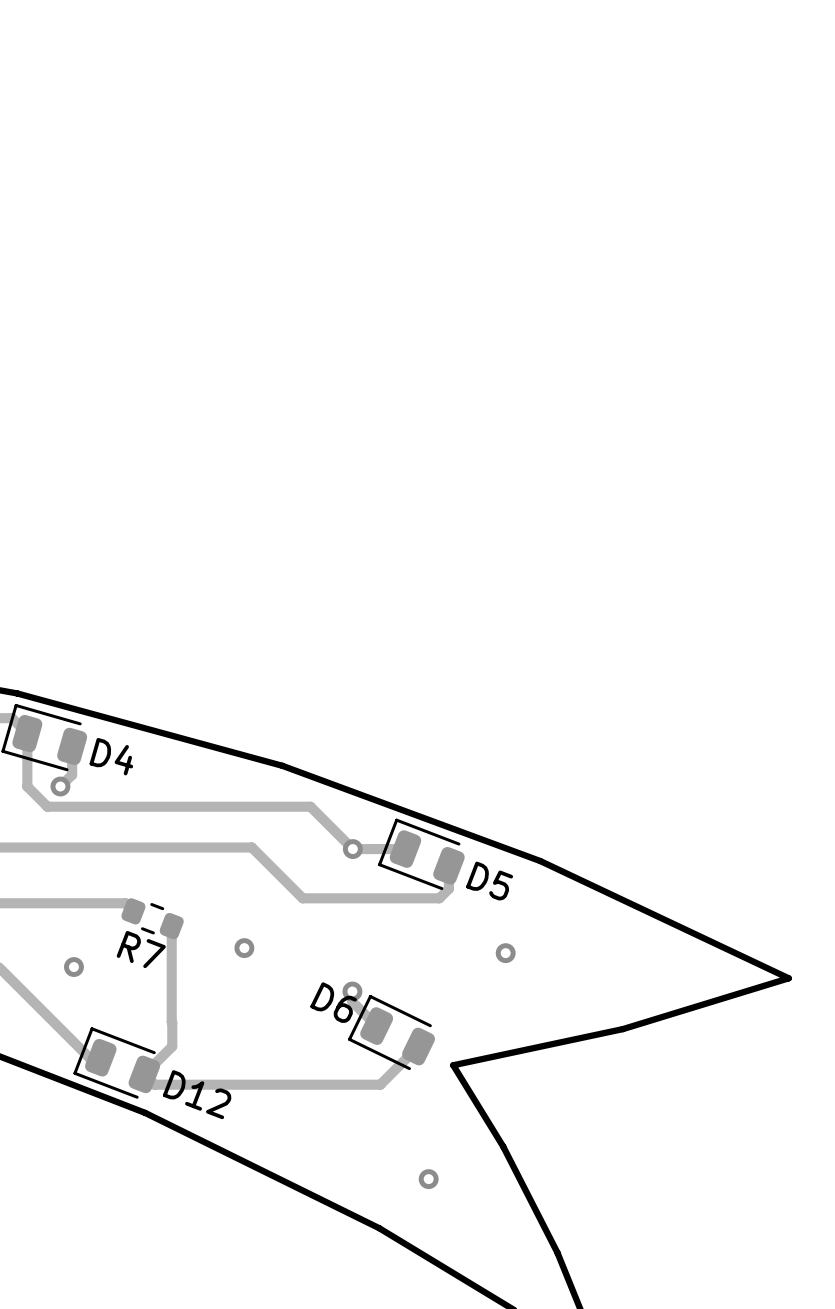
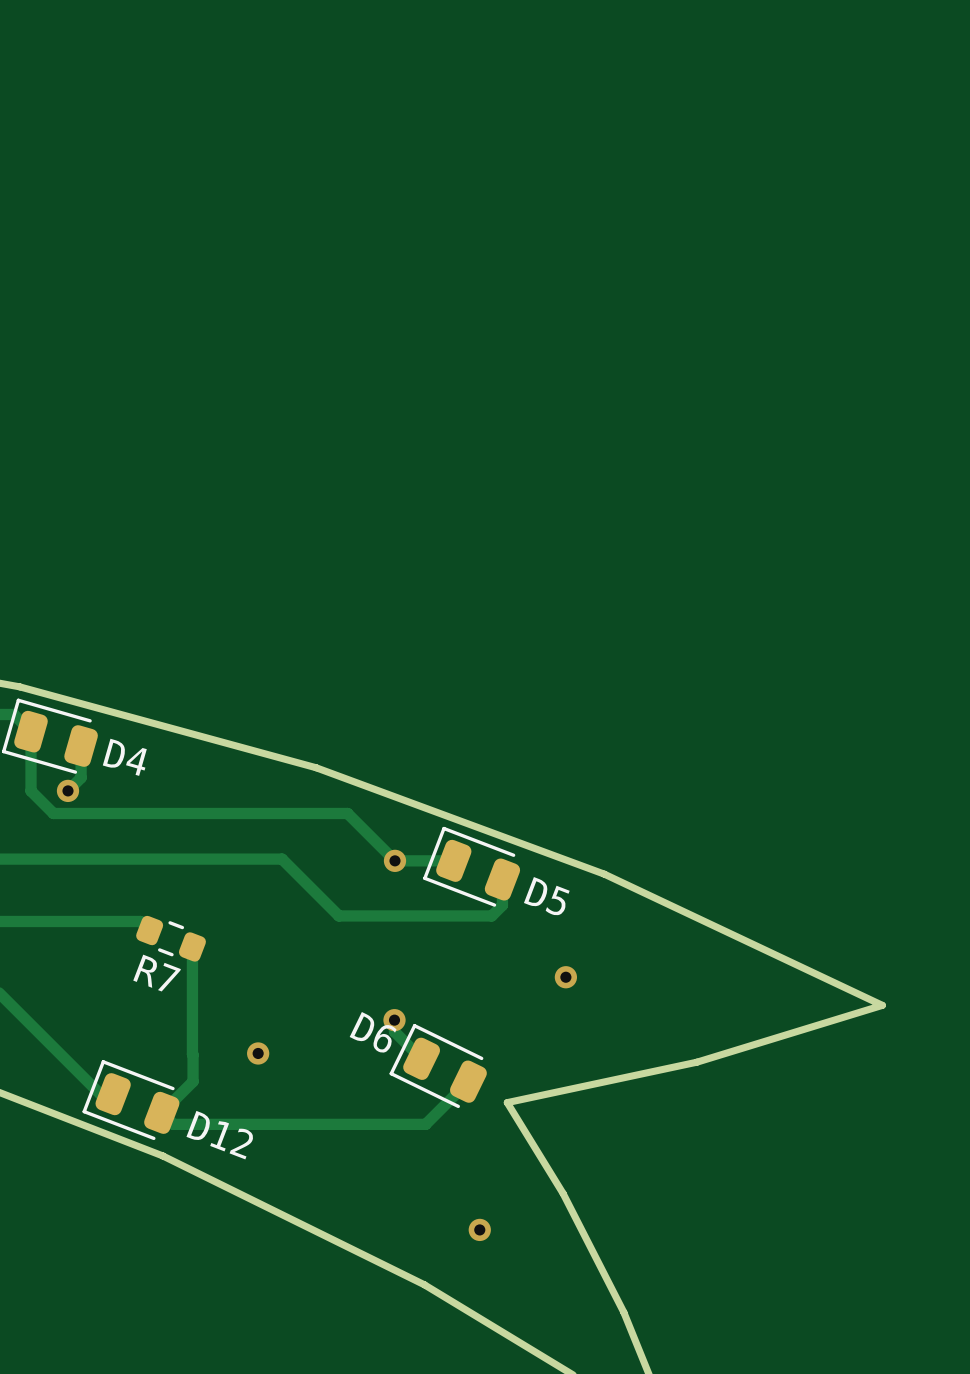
via position: (244, 948) -> (258, 1053)
via: (73, 967) -> none

